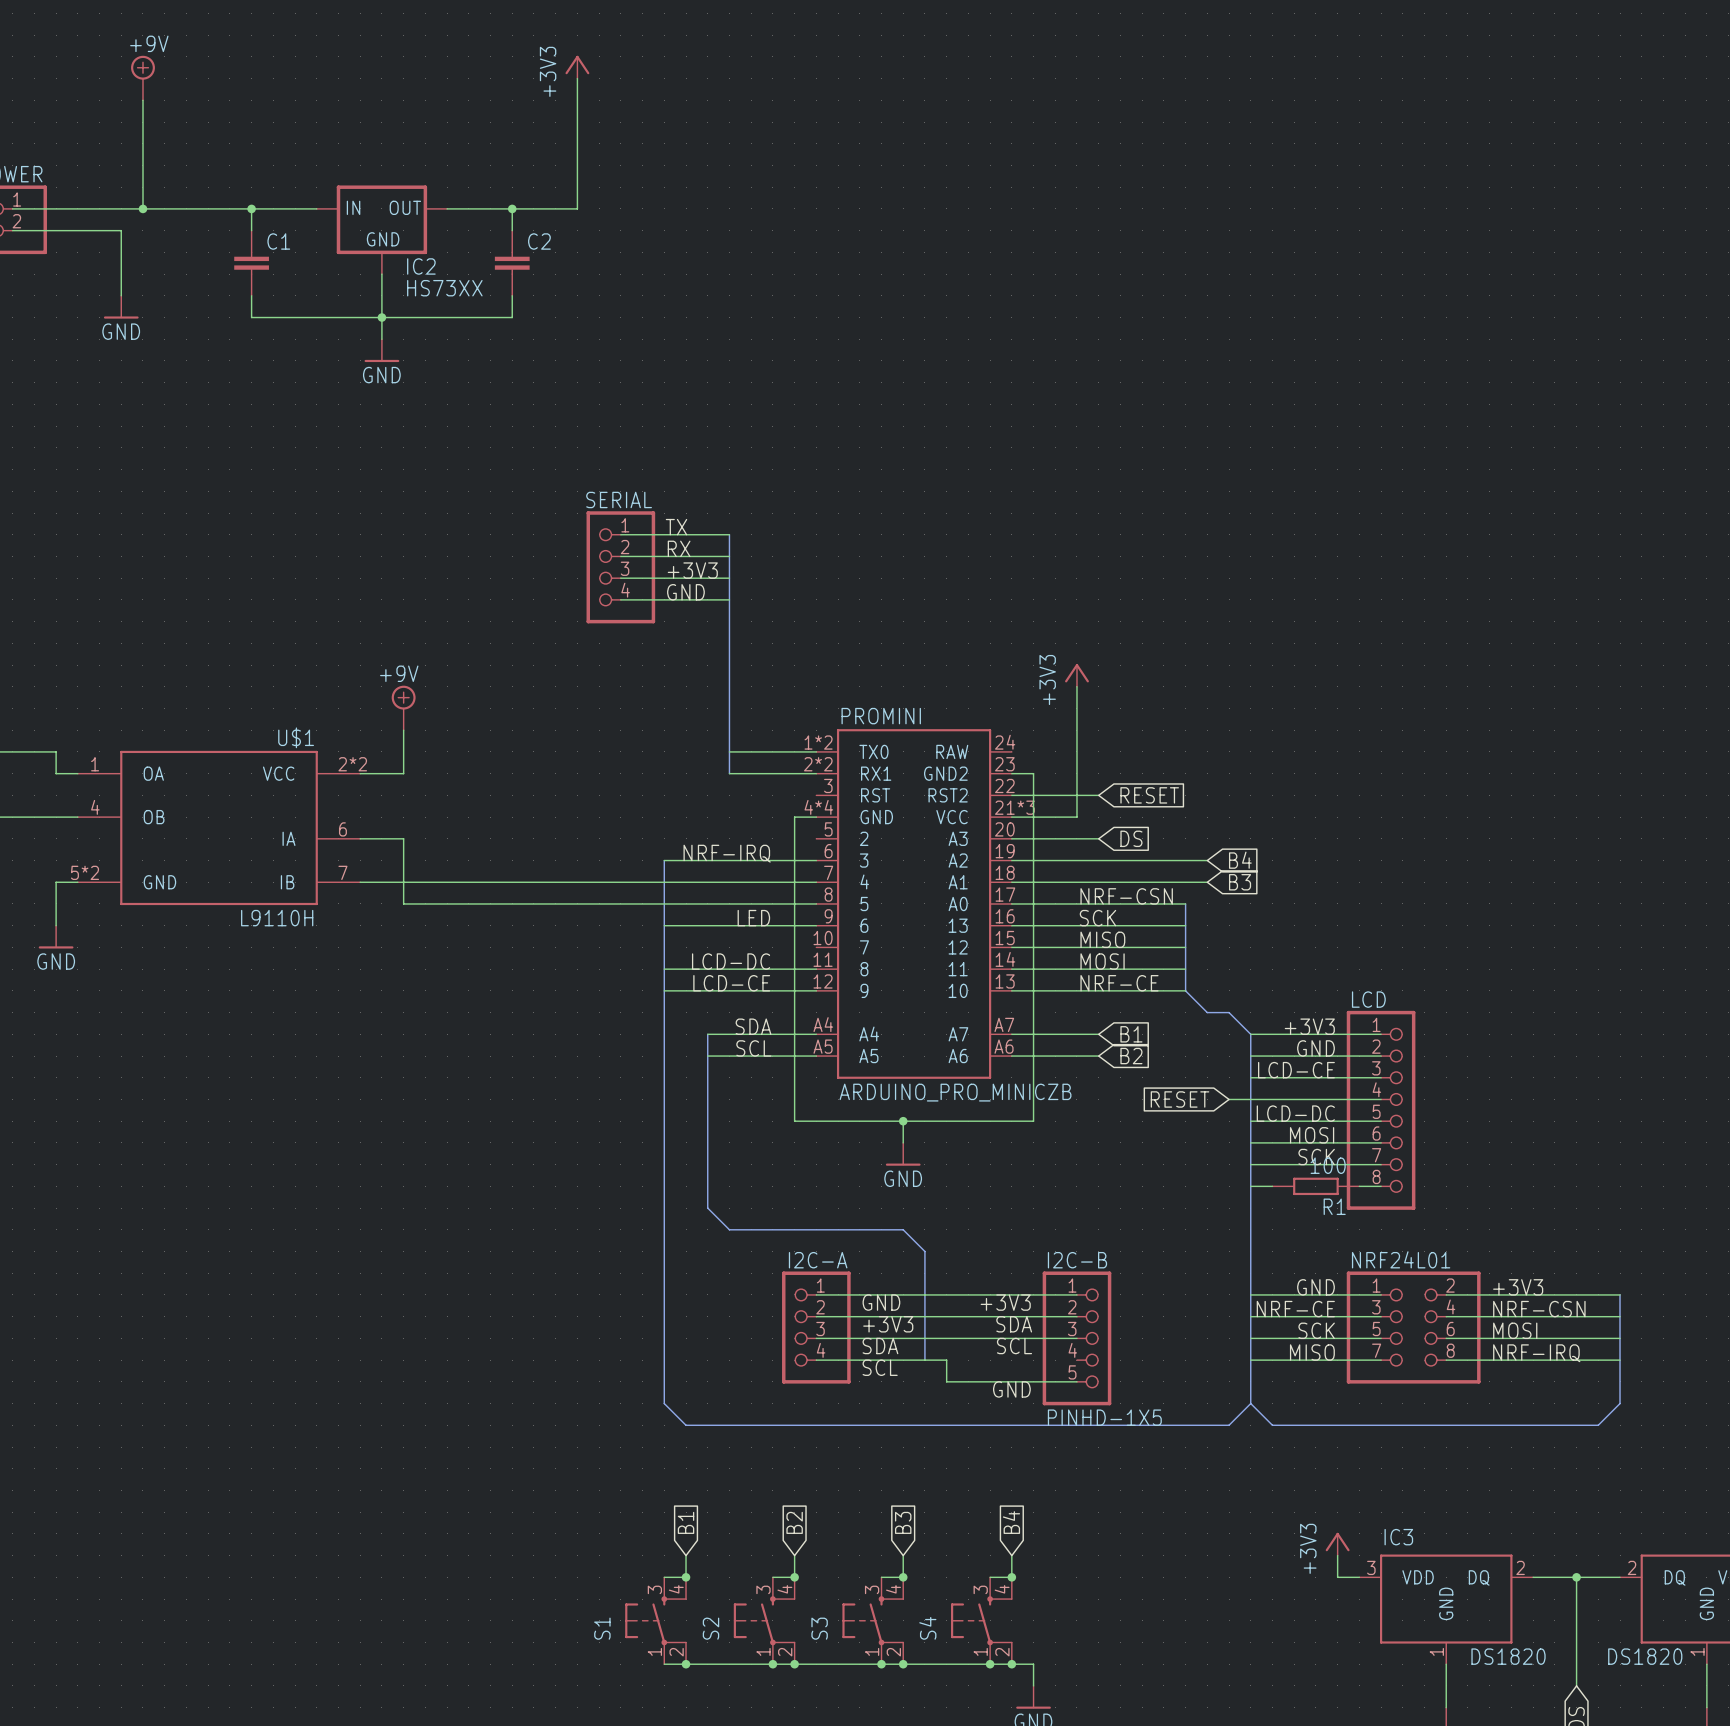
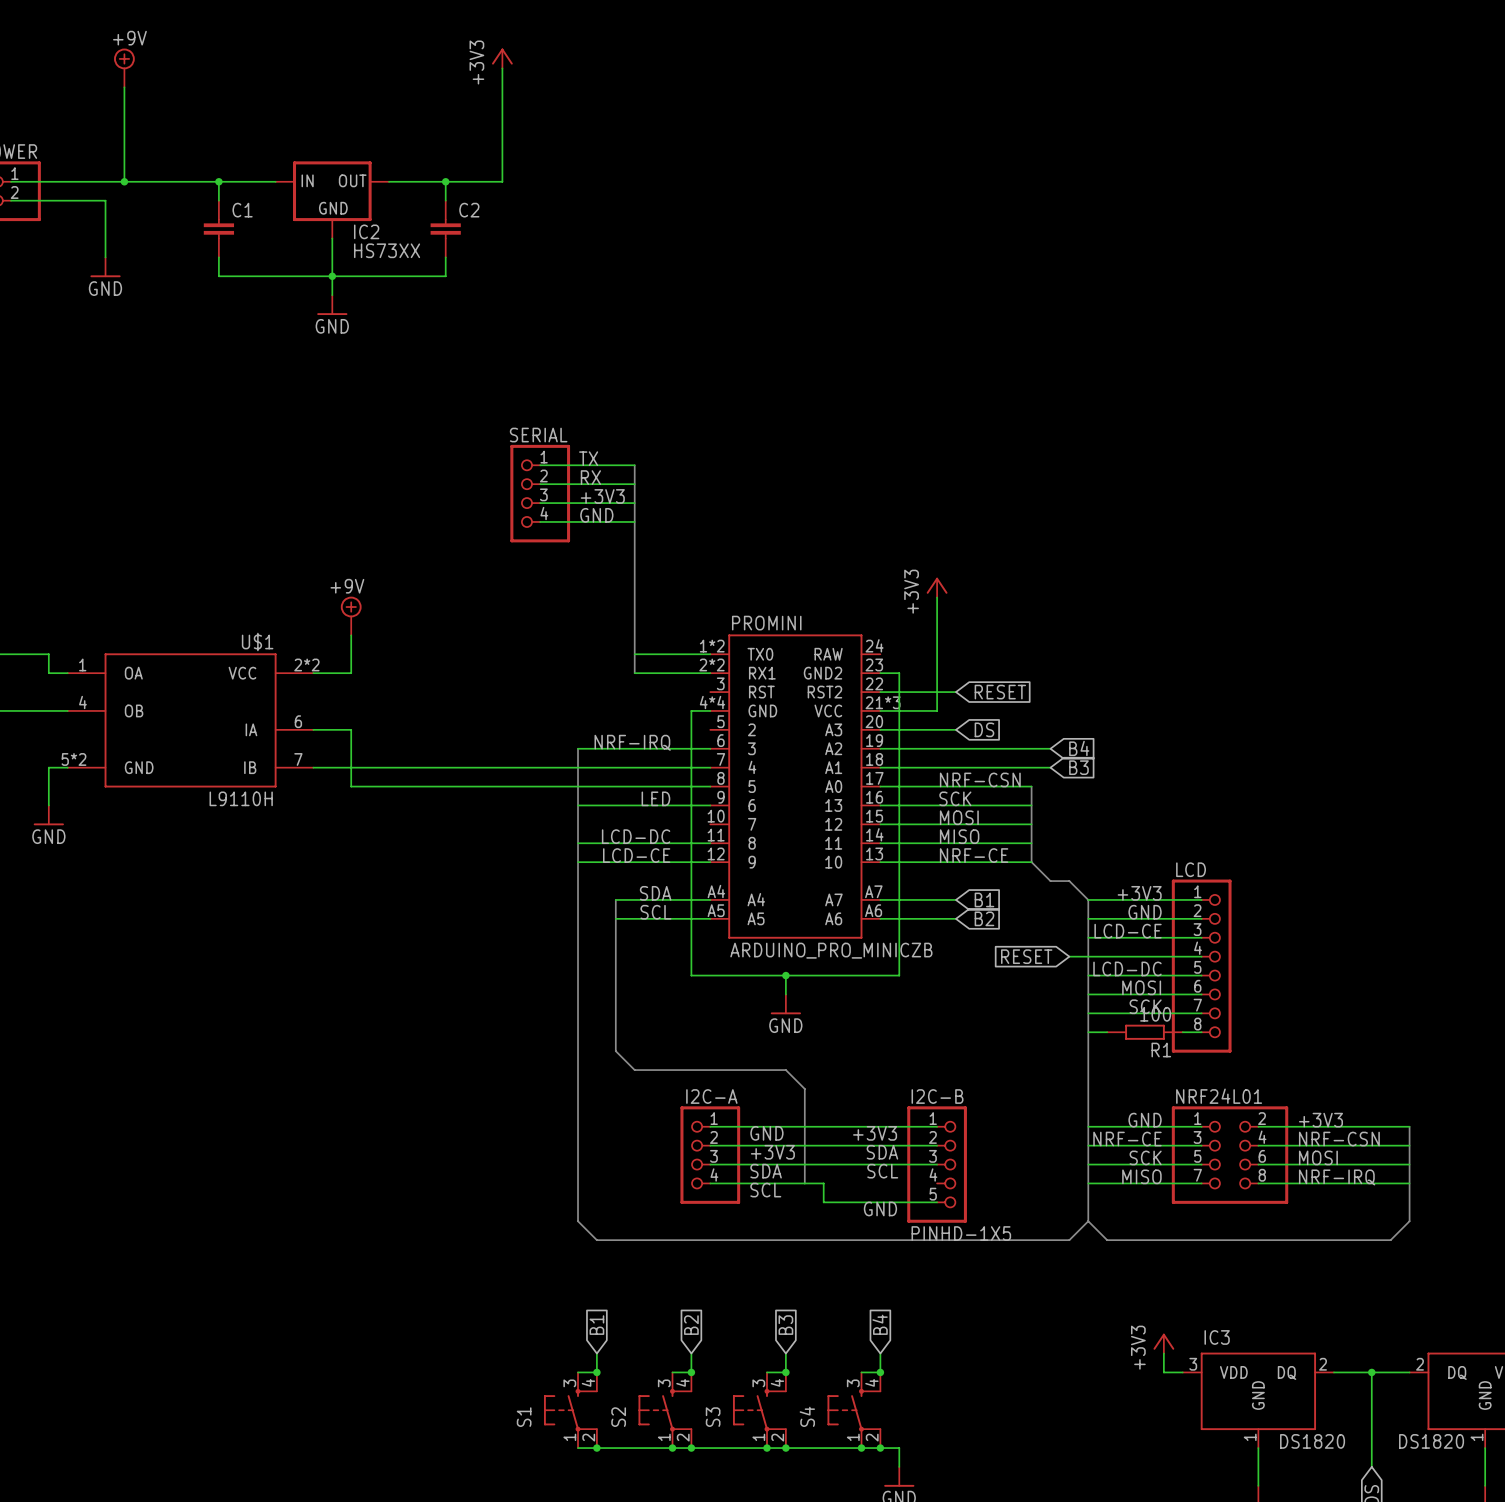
label: MISO (1102, 939) -> MOSI (959, 817)
label: MOSI (1102, 961) -> MISO (959, 836)

